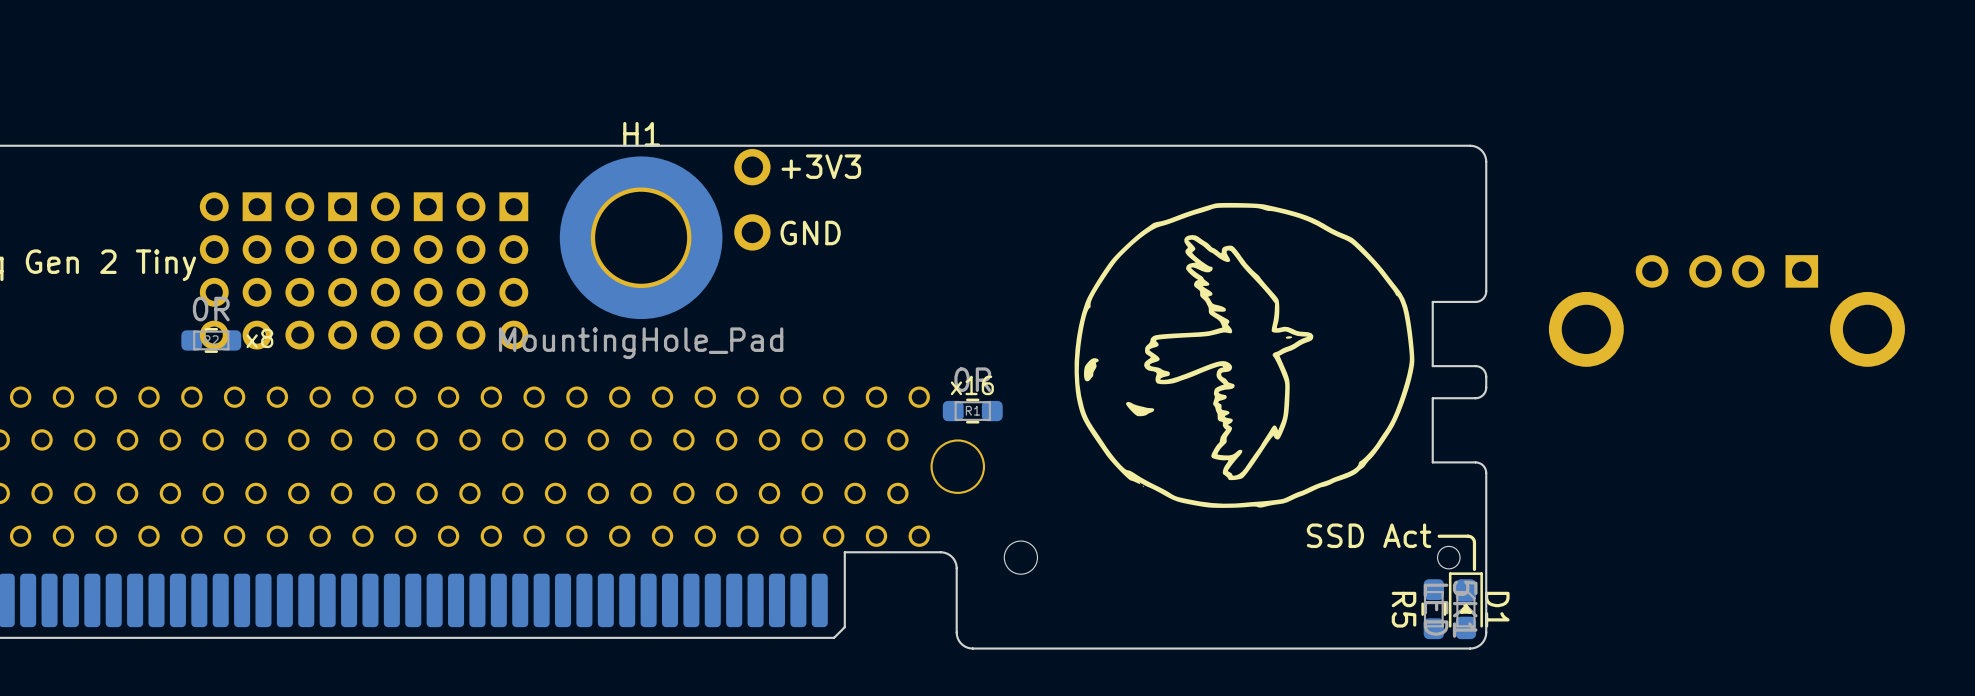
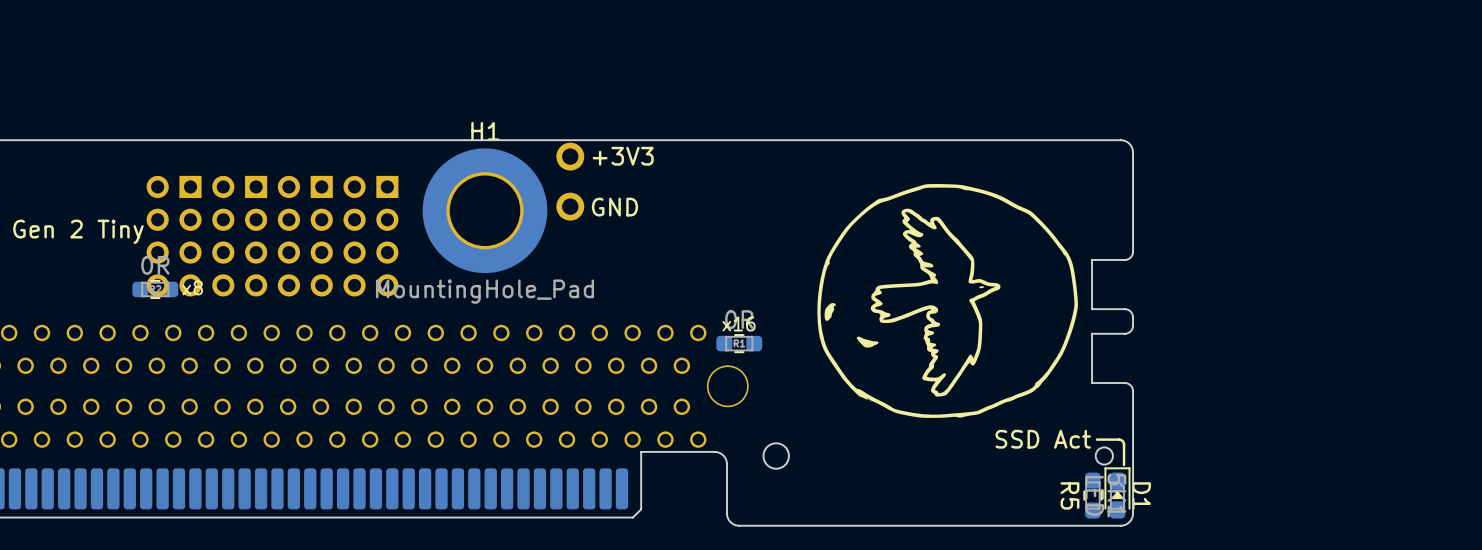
part: (1726, 310) -> none

